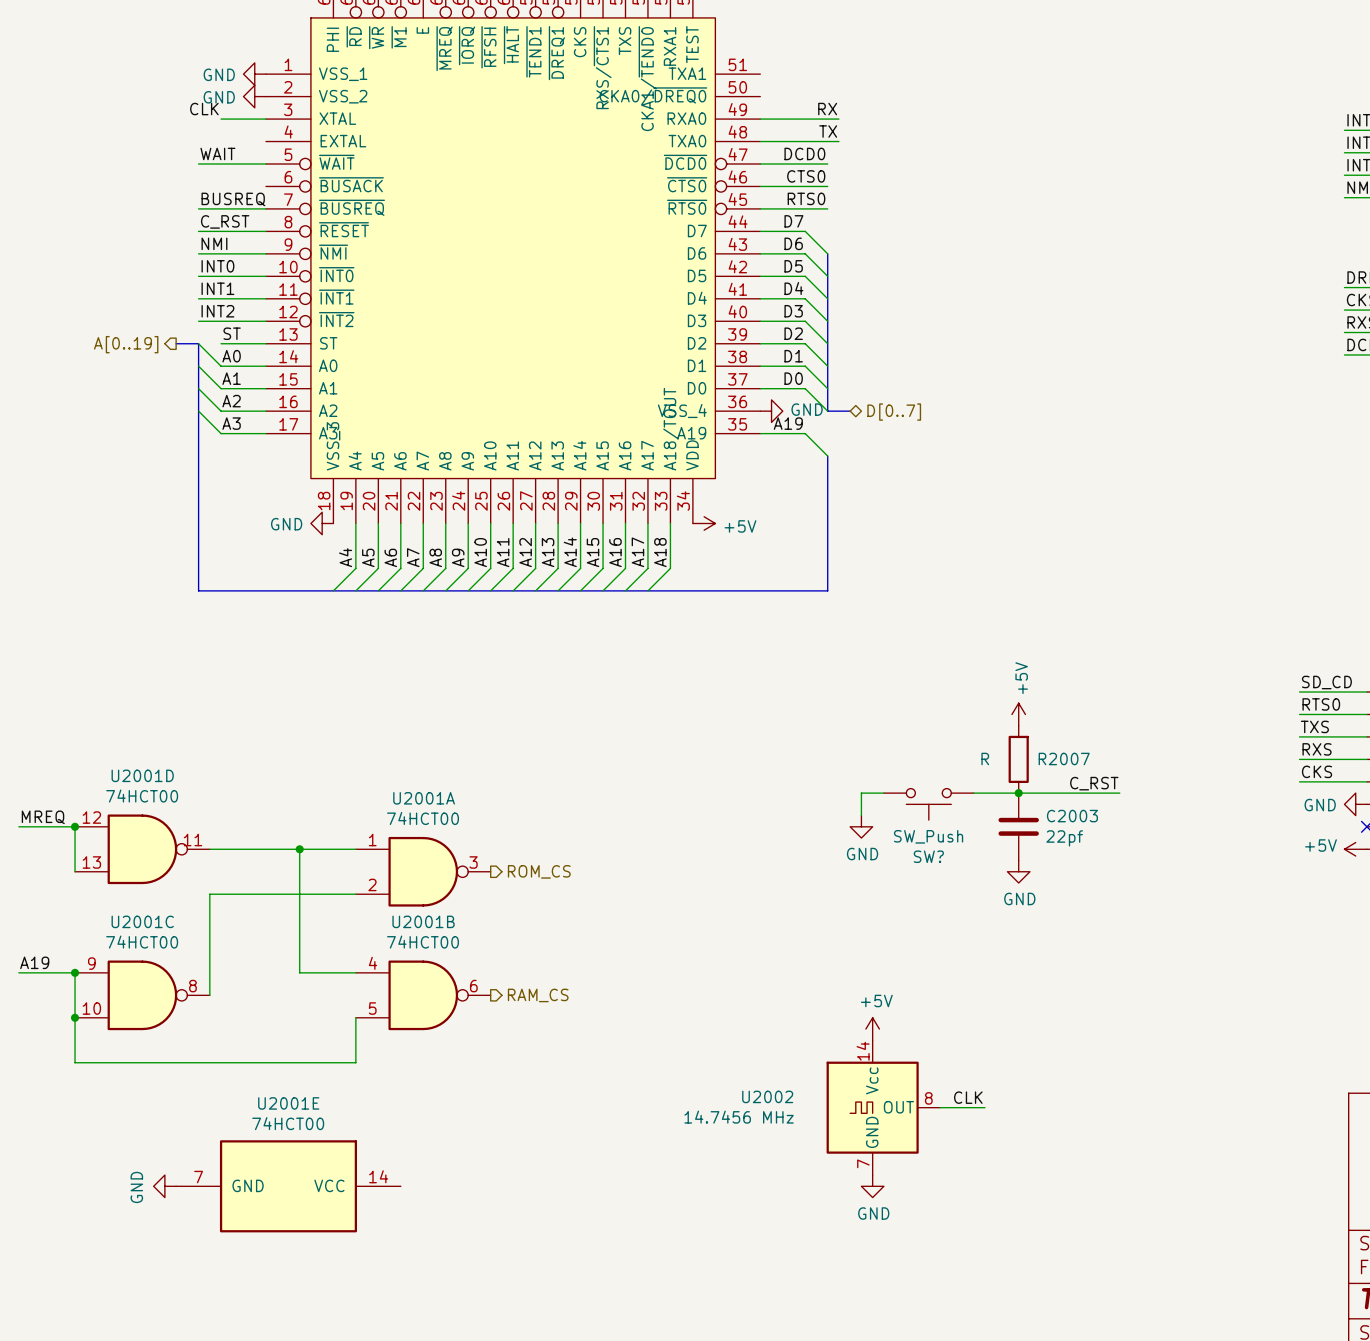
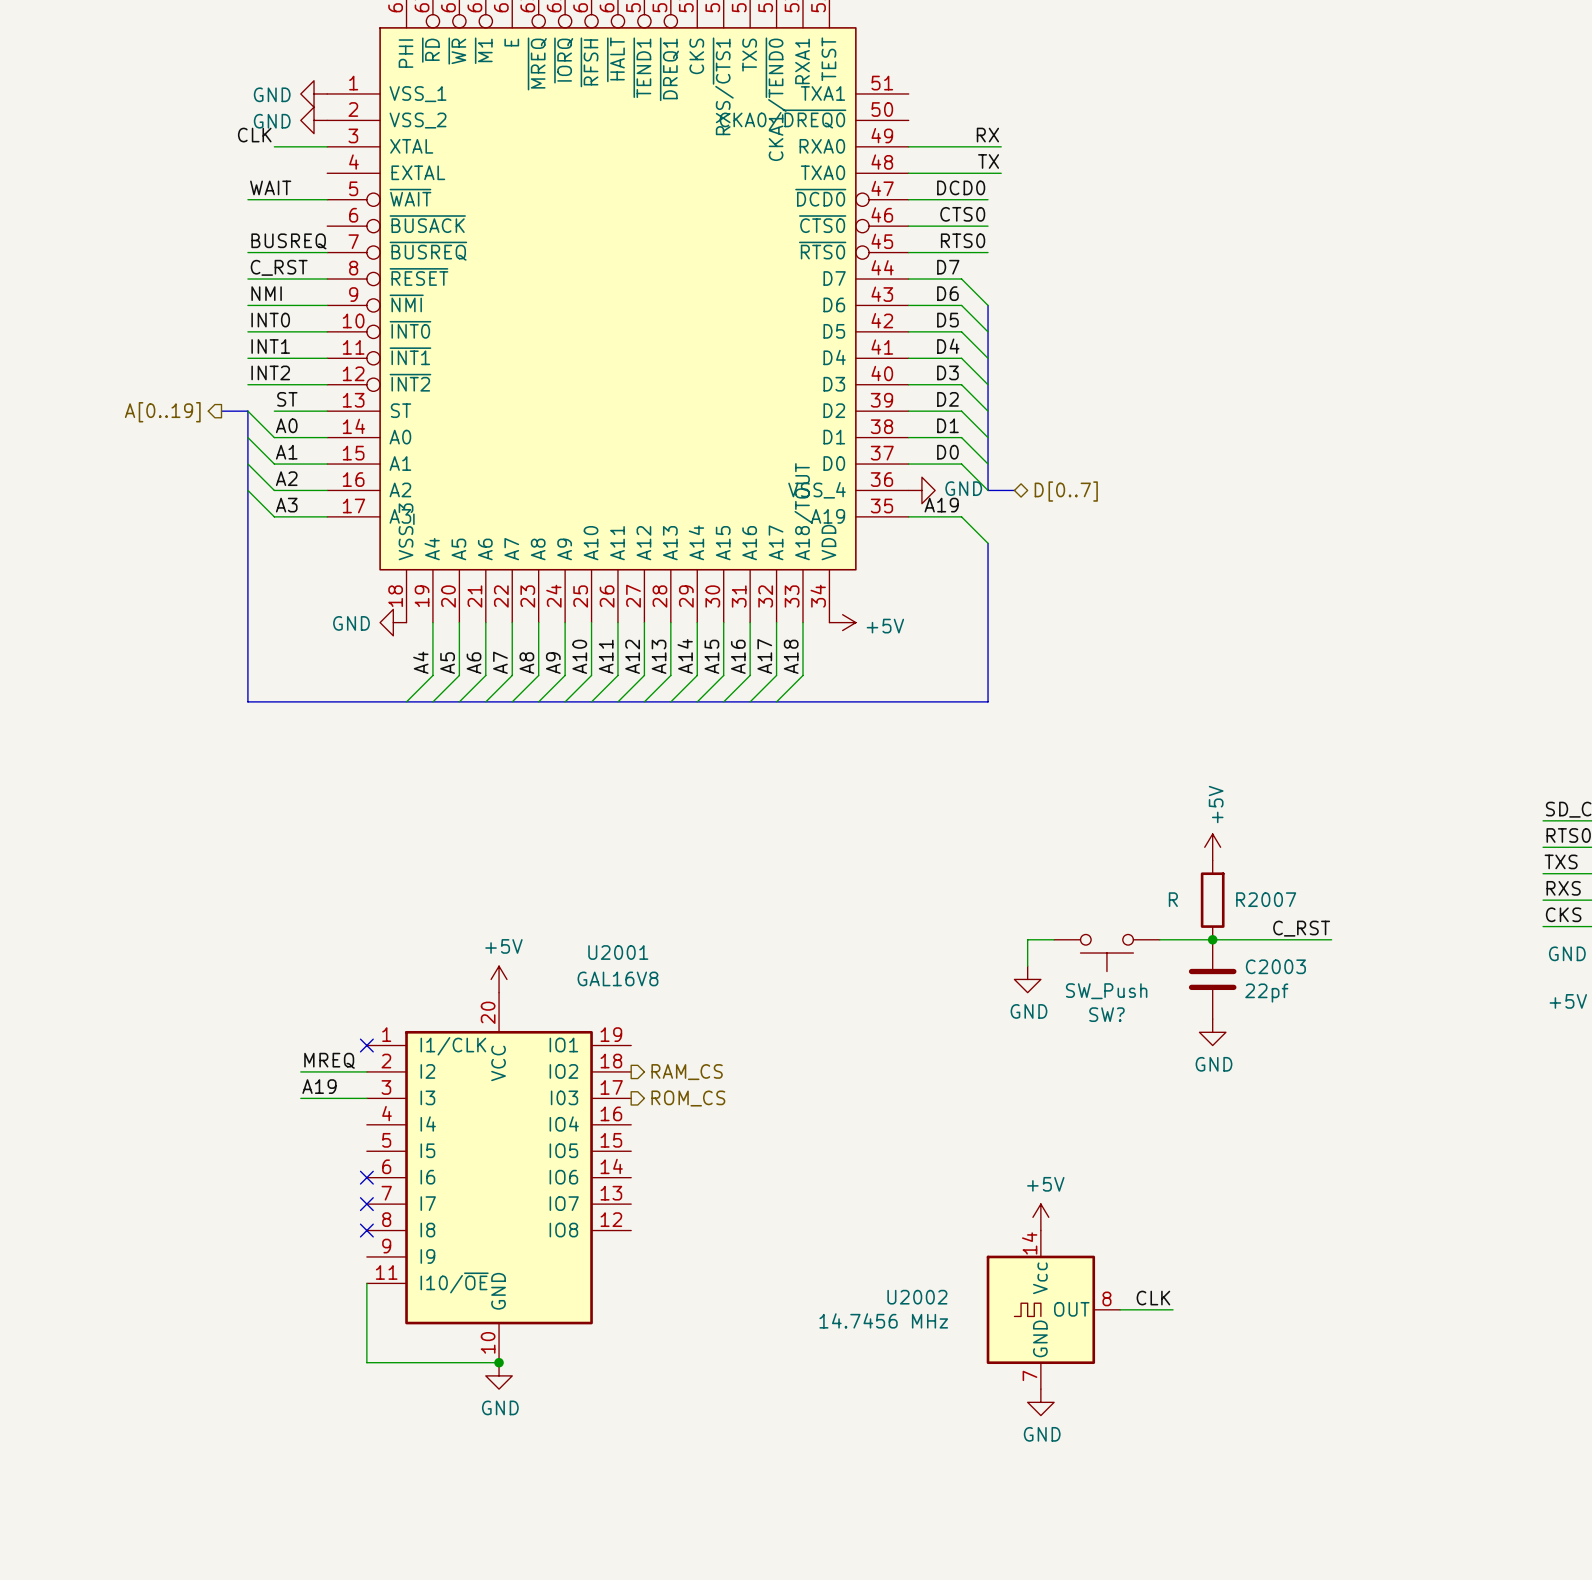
label: MREQ (43, 817) -> none
wire: (18, 826) (75, 826) (75, 871) -> none
junction: (75, 826) -> none
power symbol: none -> +5V (499, 979)
U2001D: 74HCT00 (142, 849) -> none
wire: (209, 849) (355, 849) -> none
wire: (299, 849) (299, 972) (355, 972) -> none
junction: (299, 849) -> none
U2001A: 74HCT00 (423, 871) -> none
hierarchical label position: ROM_CS (539, 871) -> ROM_CS (688, 1098)
no-connect mark: none -> (366, 1045)
wire: (355, 894) (209, 894) (209, 995) -> none
label: none -> MREQ (329, 1060)
wire: none -> (300, 1071) (366, 1071)
label: none -> A19 (319, 1086)
wire: none -> (300, 1098) (366, 1098)
label: A19 (34, 962) -> none
wire: (18, 972) (75, 972) (75, 1062) (355, 1062) (355, 1017) -> none
junction: (75, 972) -> none
U2001C: 74HCT00 (142, 995) -> none
no-connect mark: none -> (366, 1177)
U2001: none -> GAL16V8 (499, 1177)
U2001B: 74HCT00 (423, 995) -> none
hierarchical label position: RAM_CS (538, 995) -> RAM_CS (687, 1072)
junction: (75, 1017) -> none
no-connect mark: none -> (366, 1204)
no-connect mark: none -> (366, 1230)
wire: none -> (366, 1283) (366, 1362) (499, 1362)
junction: none -> (499, 1362)
power symbol: none -> GND (499, 1375)
power symbol: GND (164, 1186) -> none
U2001E: 74HCT00 (288, 1186) -> none

